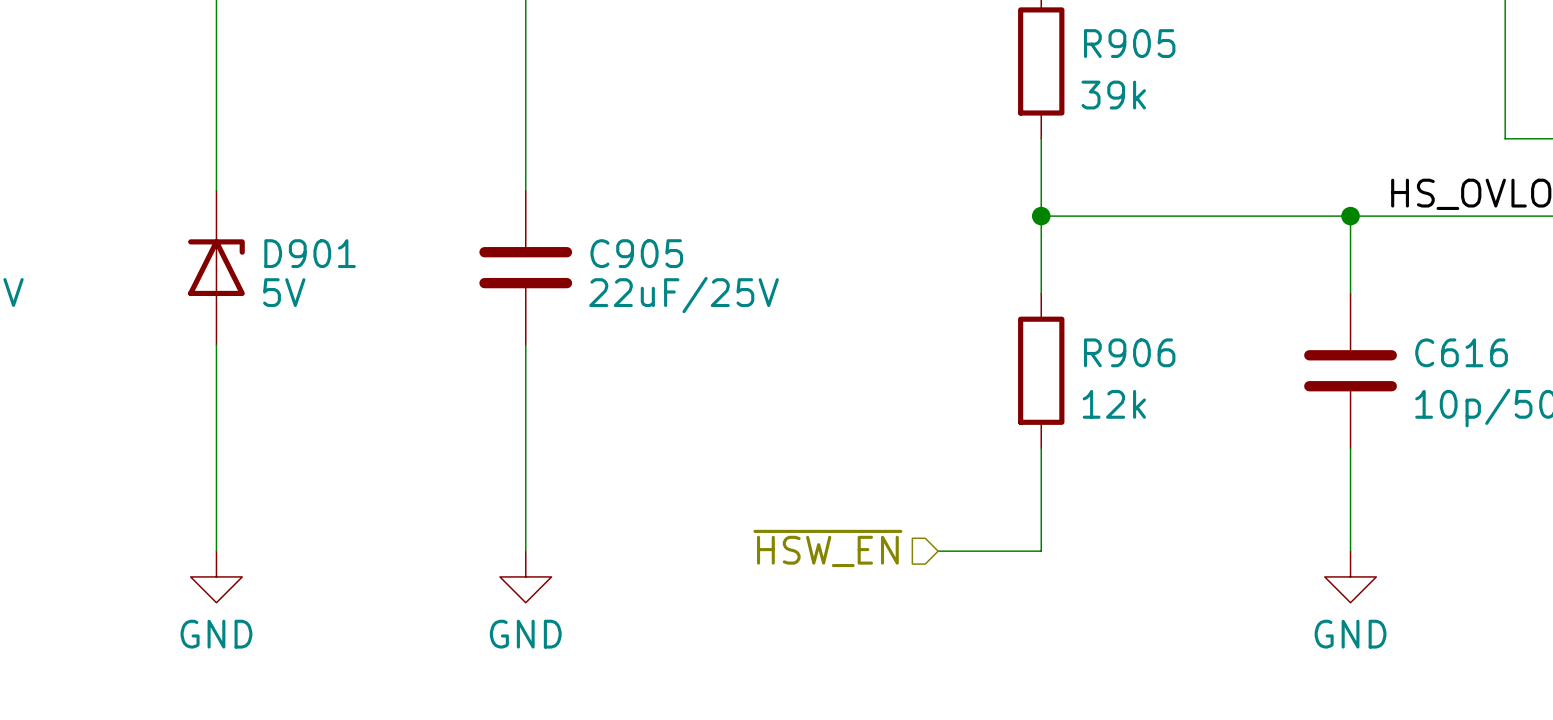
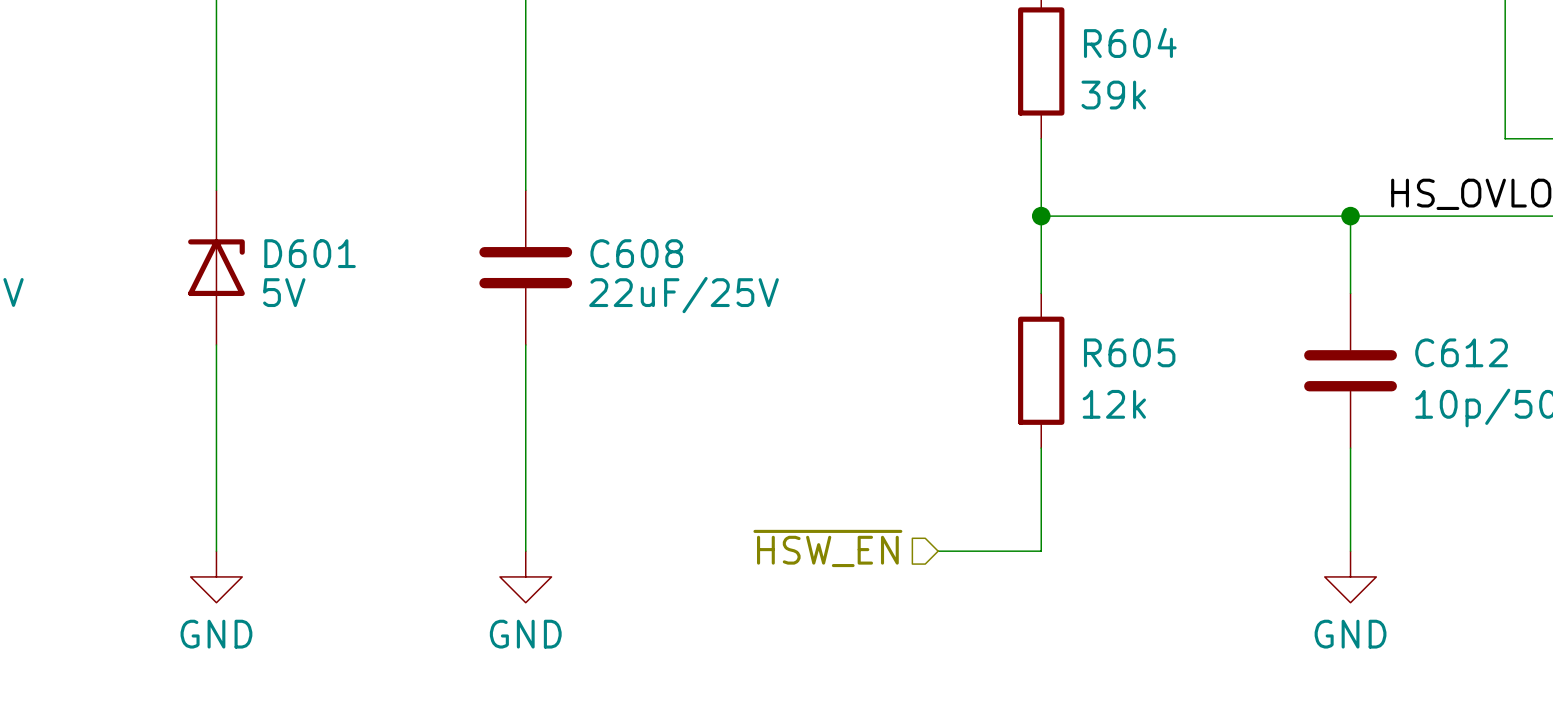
R905 name: R905 (1129, 43) -> R604 (1130, 42)
D901 name: D901 (310, 253) -> D601 (310, 253)
C905 name: C905 (636, 253) -> C608 (636, 253)
R906 name: R906 (1129, 352) -> R605 (1129, 352)
C616 name: C616 (1461, 352) -> C612 (1461, 352)

